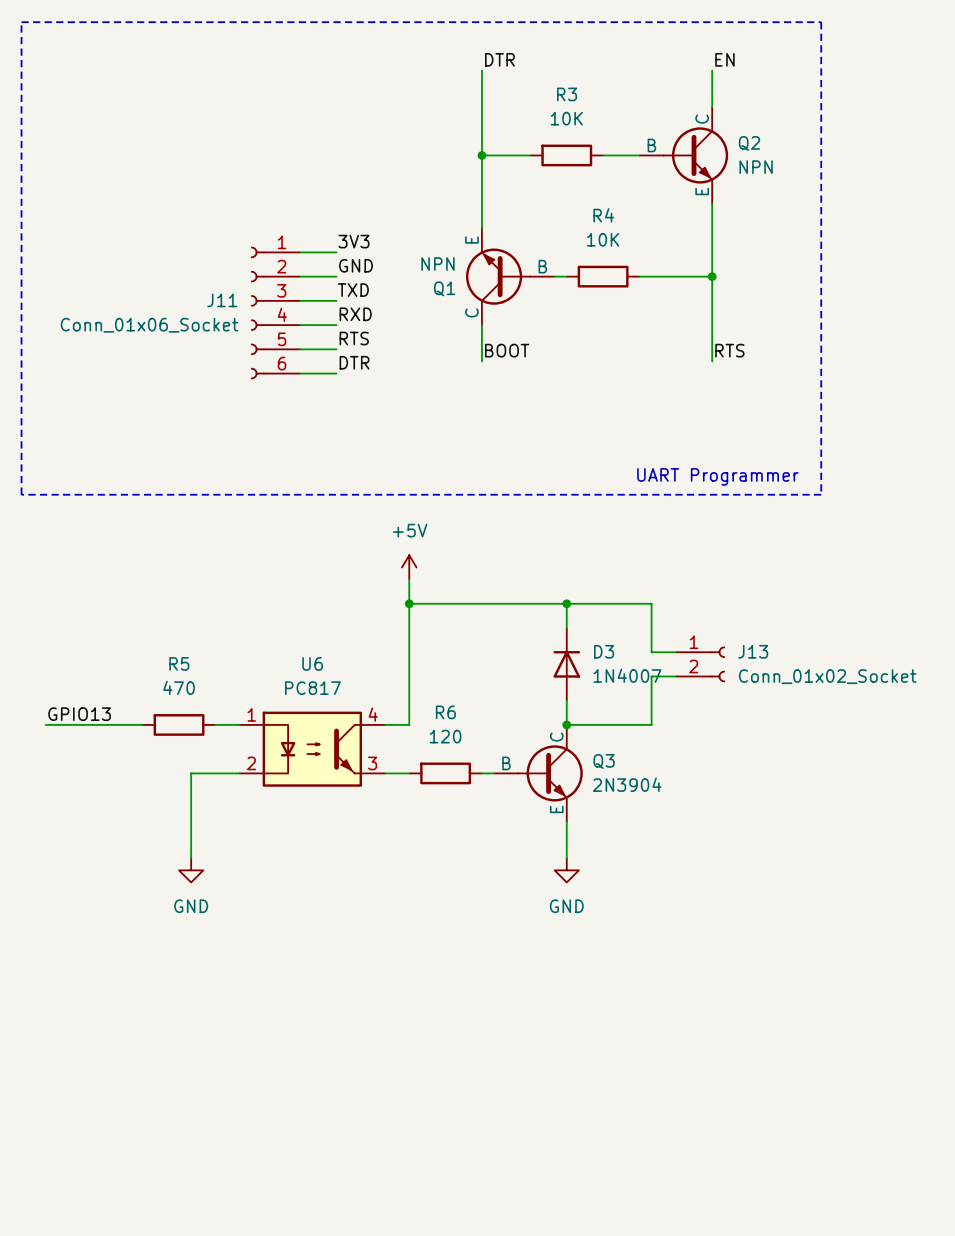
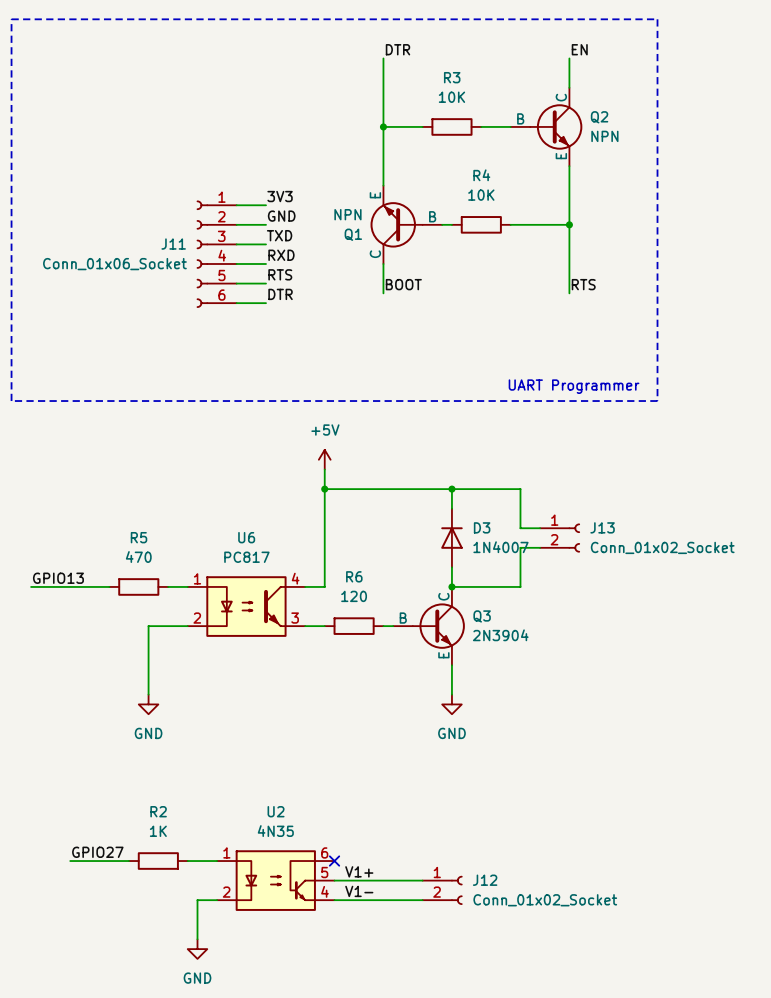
label: none -> GPIO27 (97, 852)
wire: none -> (70, 861) (128, 861)
R2: none -> 1K (158, 861)
wire: none -> (187, 861) (217, 861)
no-connect mark: none -> (334, 861)
label: none -> V1+ (359, 871)
U2: none -> 4N35 (275, 880)
wire: none -> (334, 880) (422, 880)
J12: none -> Conn_01x02_Socket (442, 890)
label: none -> V1- (359, 891)
wire: none -> (217, 900) (197, 900) (197, 939)
wire: none -> (334, 900) (422, 900)
power symbol: none -> GND (197, 949)

